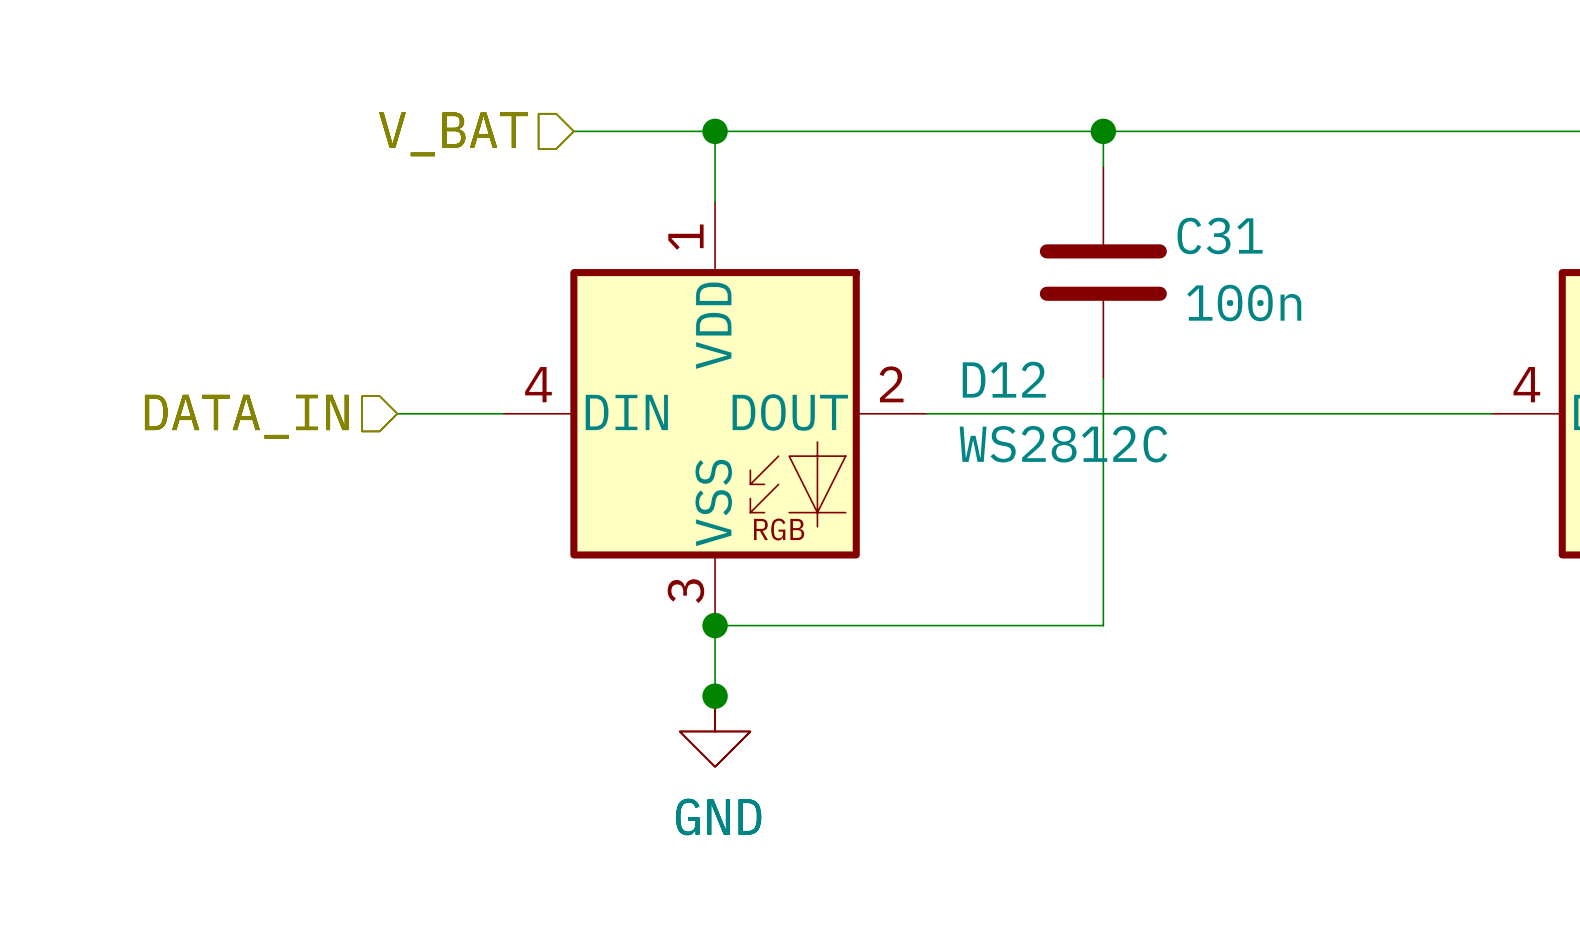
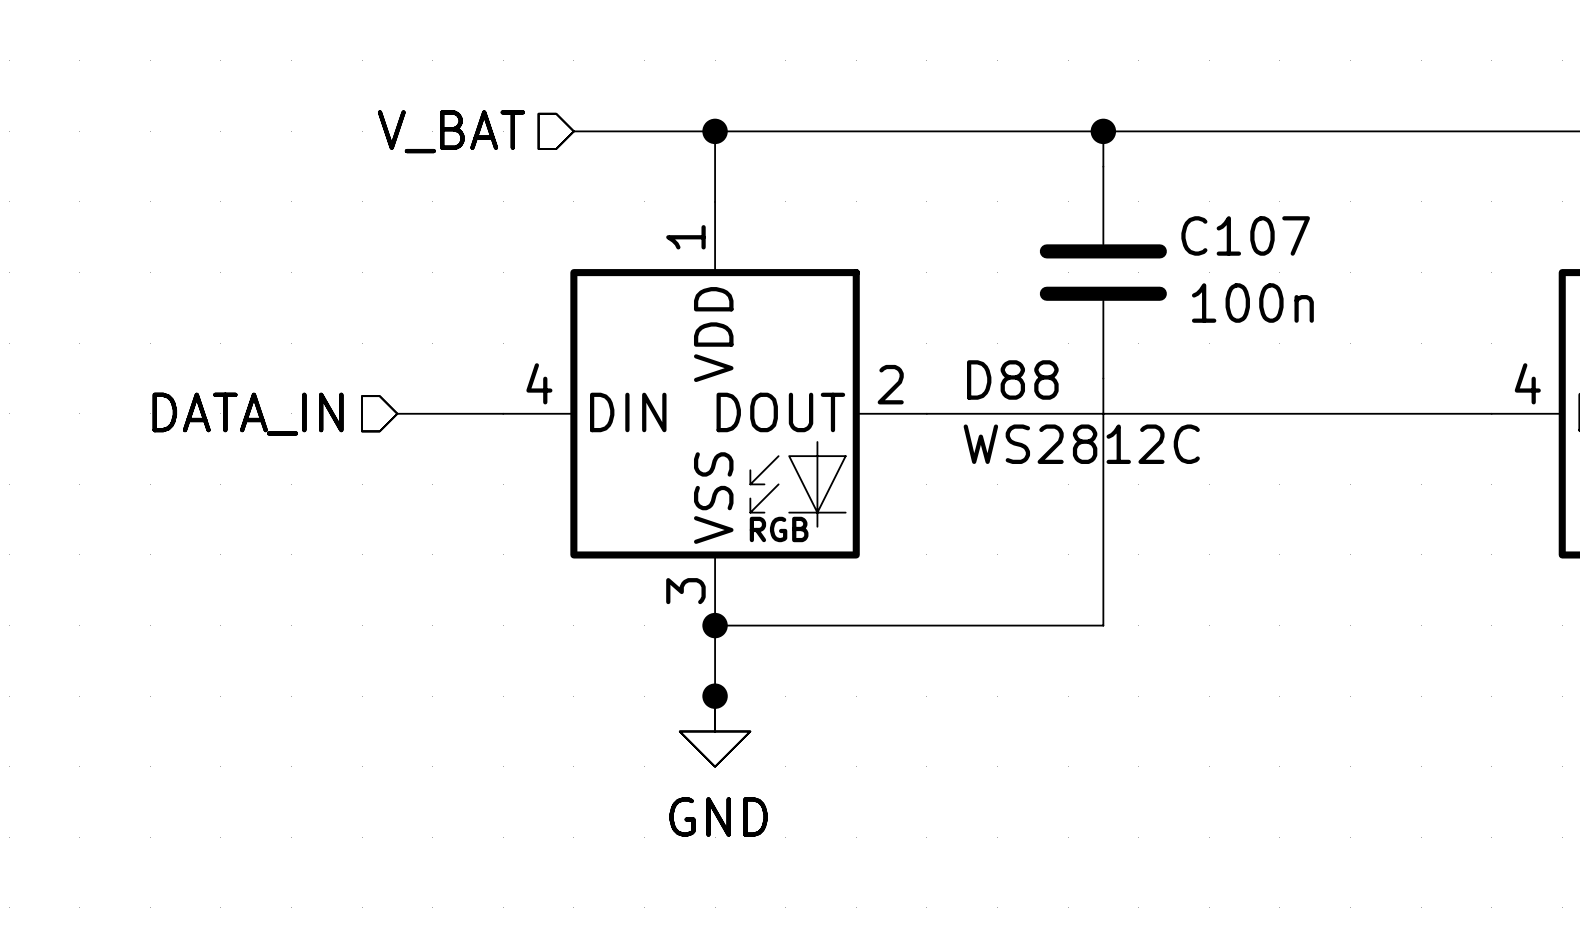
C31 name: C31 (1220, 235) -> C107 (1245, 235)
D12 name: D12 (1004, 379) -> D88 (1012, 379)

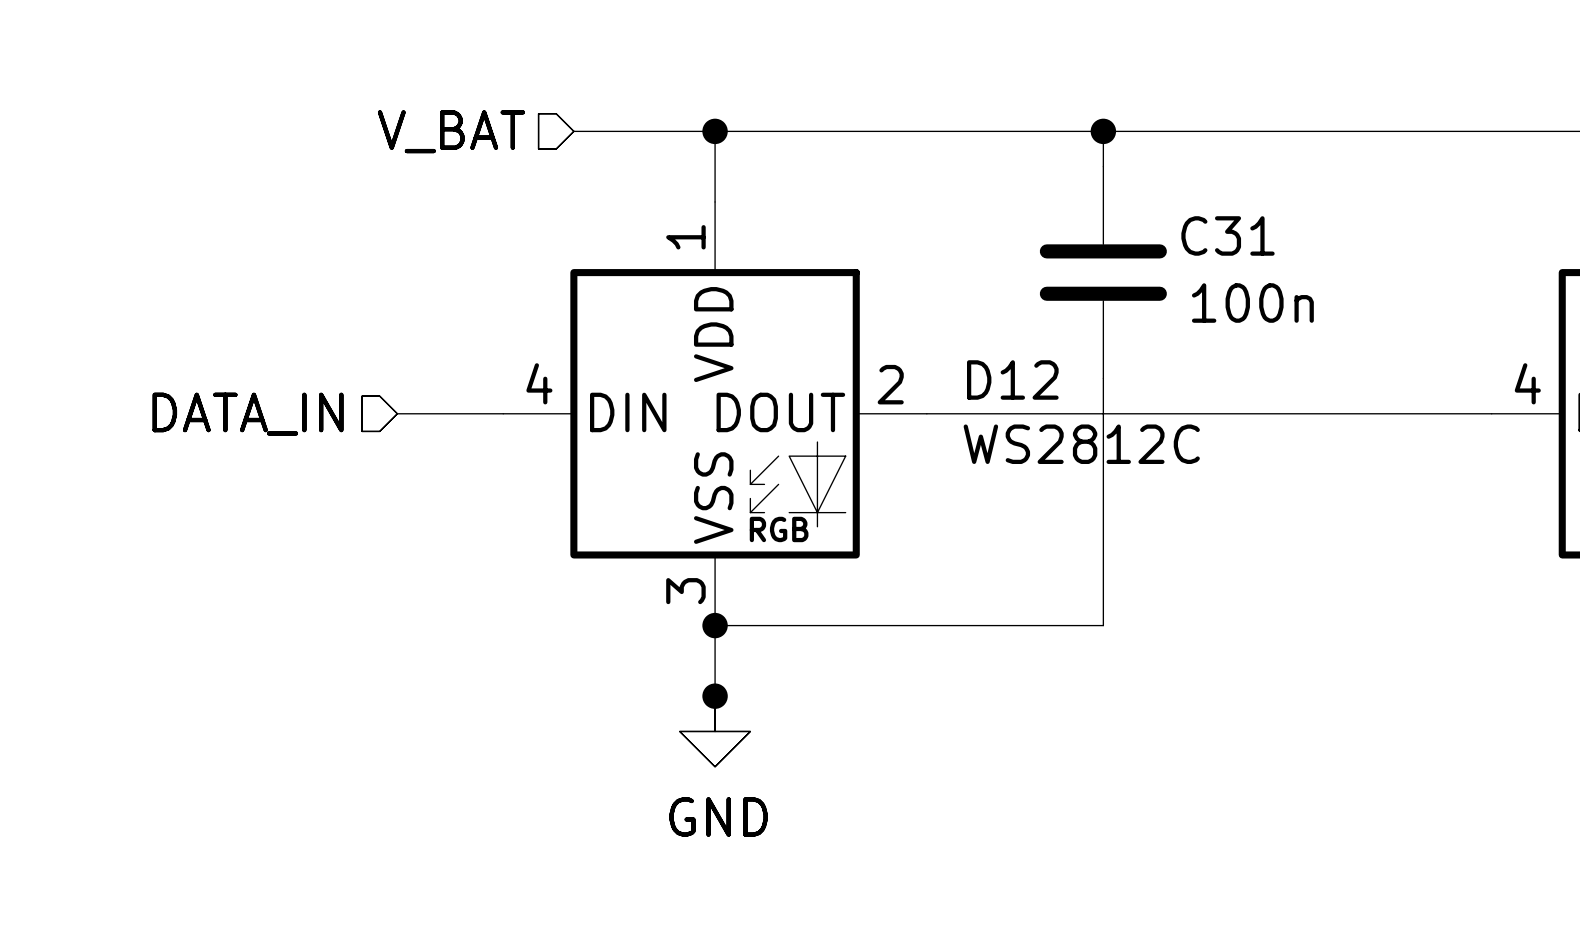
C107 name: C107 (1245, 235) -> C31 (1228, 235)
D88 name: D88 (1012, 379) -> D12 (1012, 379)

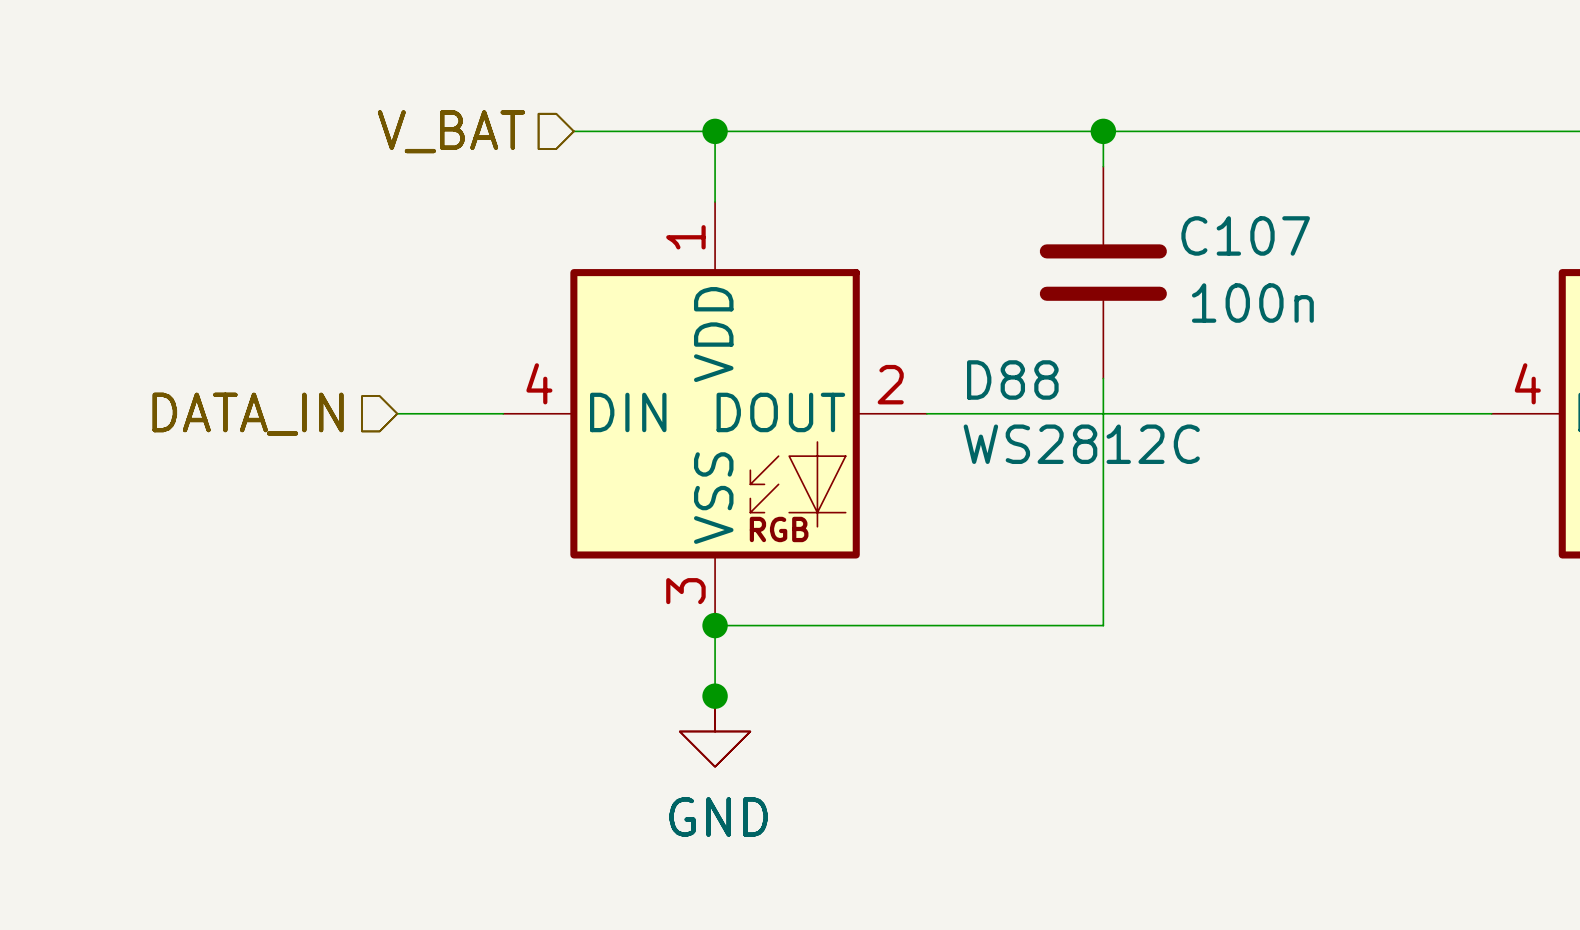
C31 name: C31 (1228, 235) -> C107 (1245, 235)
D12 name: D12 (1012, 379) -> D88 (1012, 379)

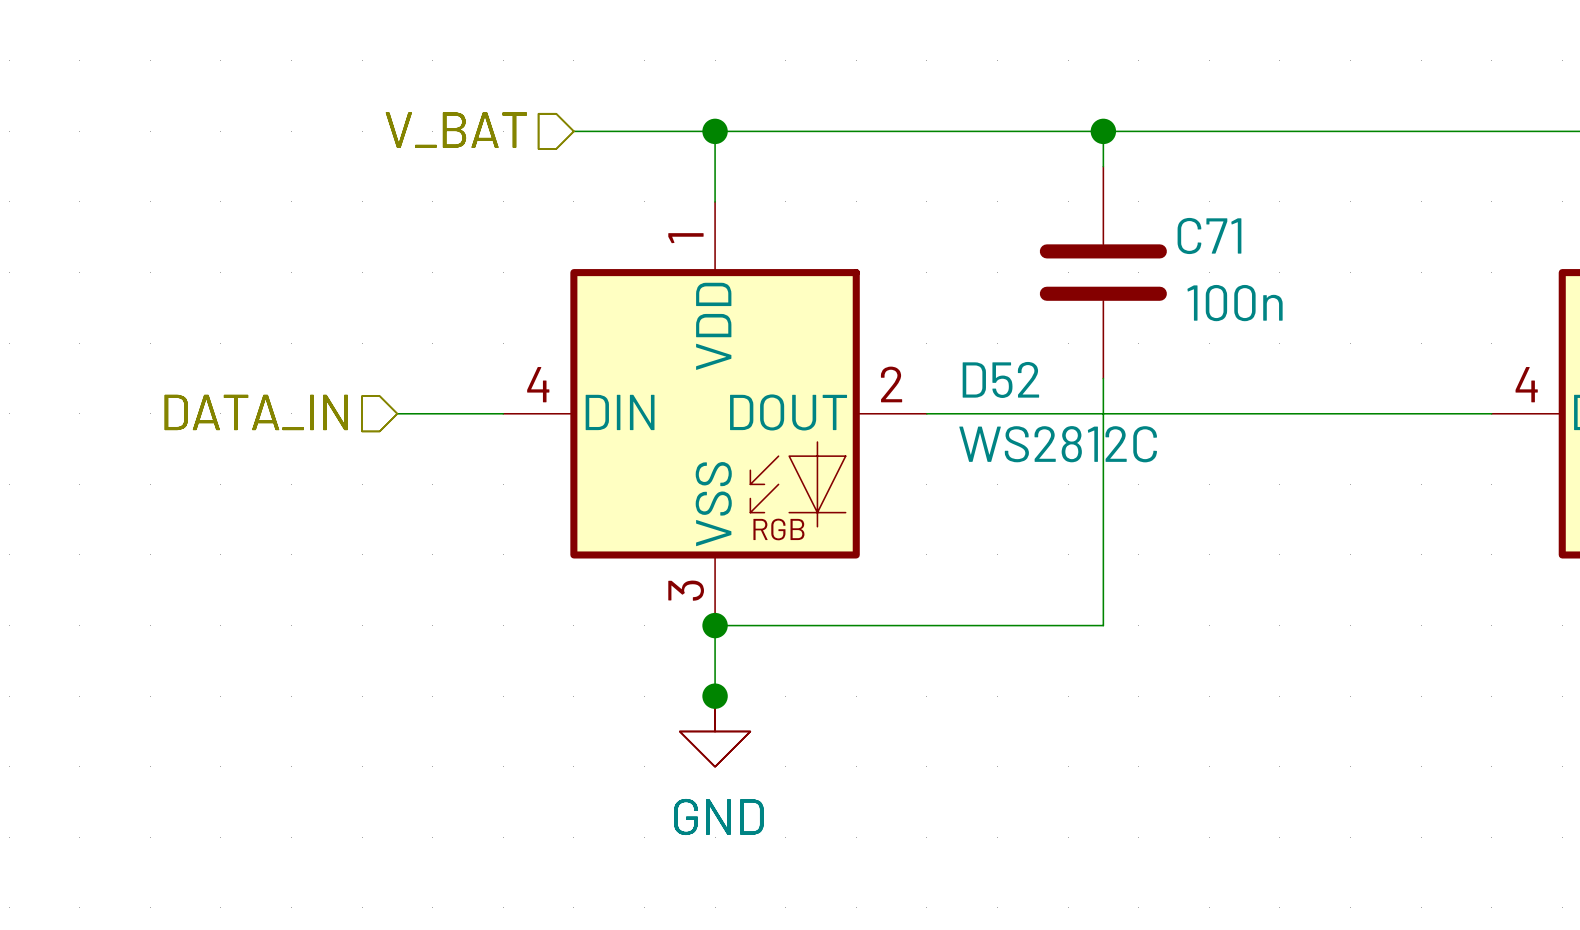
C107 name: C107 (1245, 235) -> C71 (1209, 235)
D88 name: D88 (1012, 379) -> D52 (1000, 379)

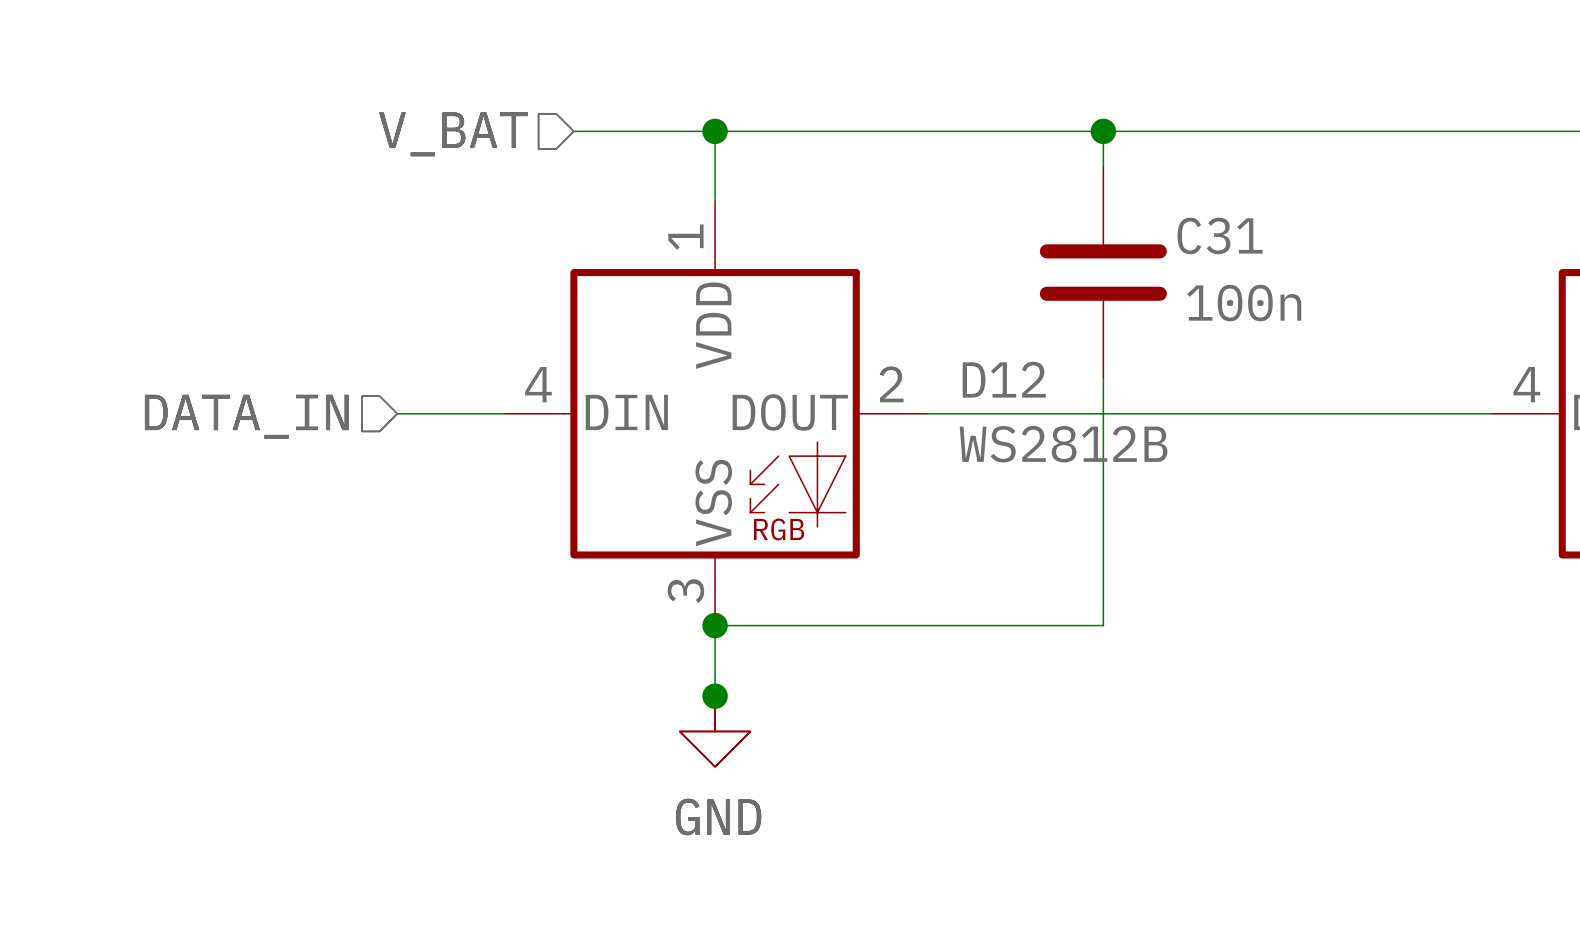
C71 name: C71 (1209, 235) -> C31 (1220, 235)
D52 name: D52 (1000, 379) -> D12 (1004, 379)
D52 value: WS2812C (1058, 444) -> WS2812B (1063, 444)

